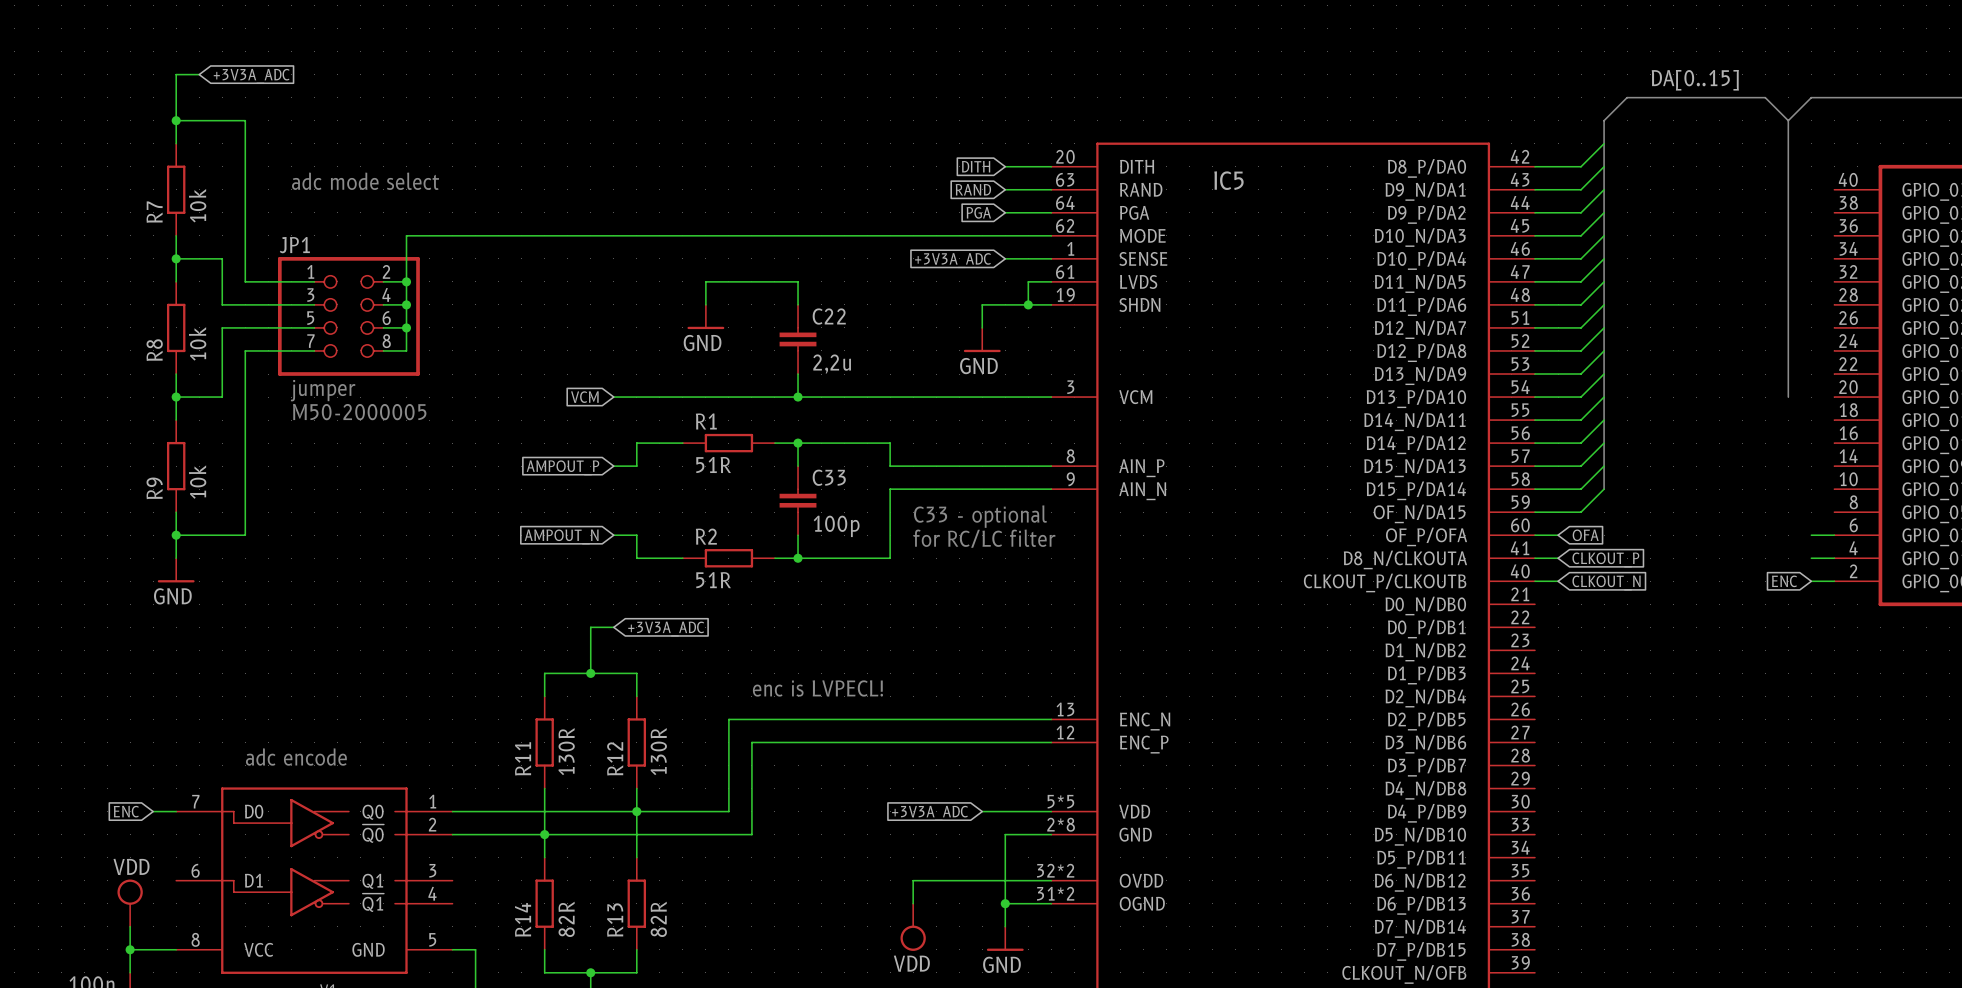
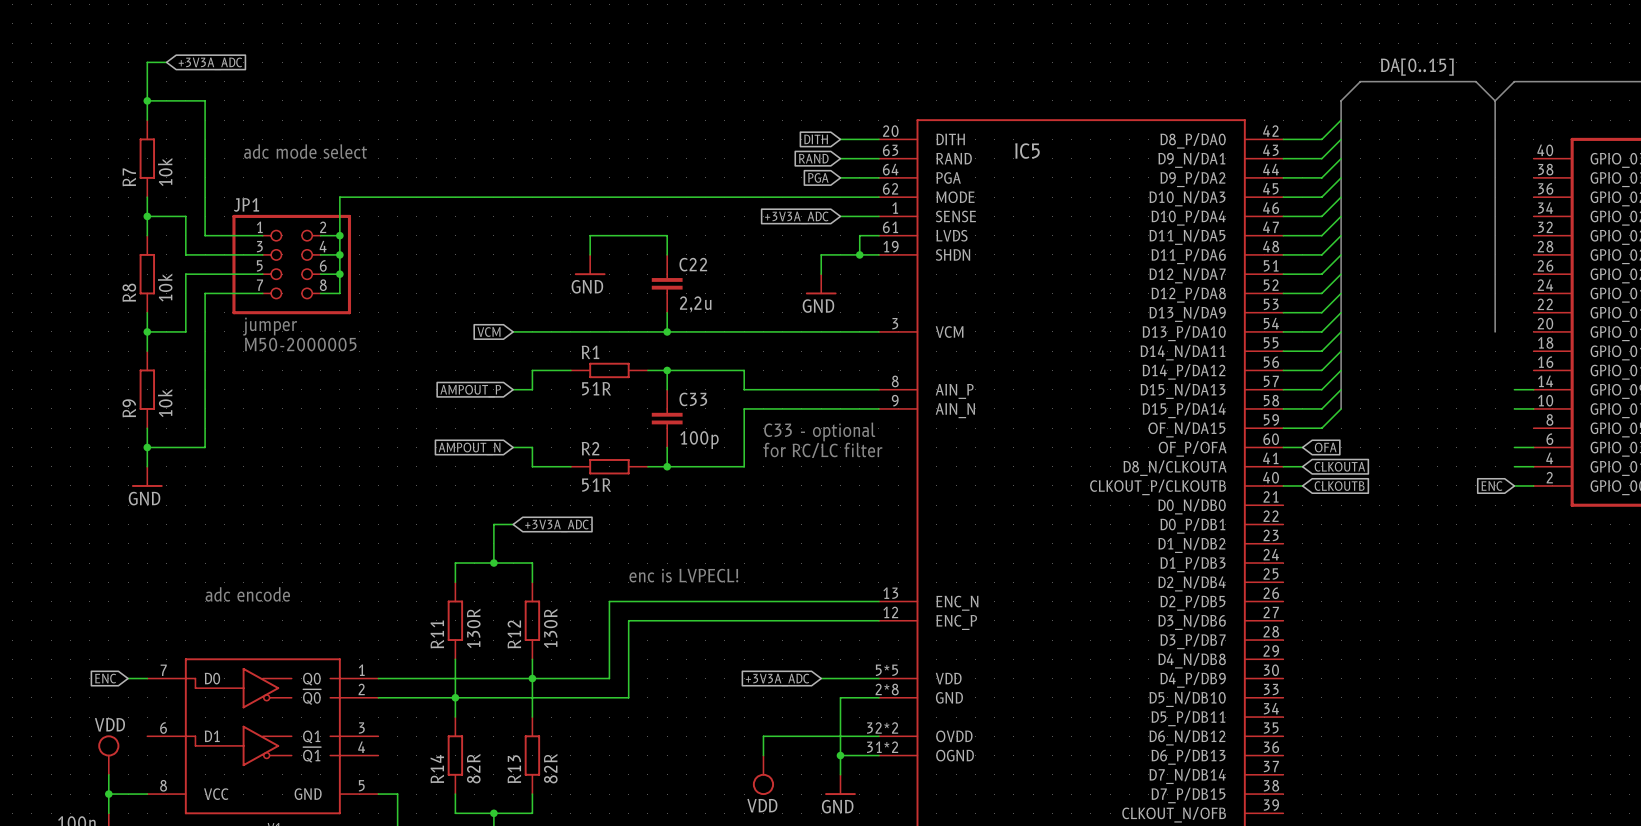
wire: none -> (1514, 389) (1533, 389)
wire: none -> (1514, 408) (1533, 408)
global label: CLKOUT_P (1605, 559) -> CLKOUTA (1339, 466)
global label: CLKOUT_N (1606, 583) -> CLKOUTB (1339, 486)
text position: adc encode (296, 757) -> adc encode (247, 594)

